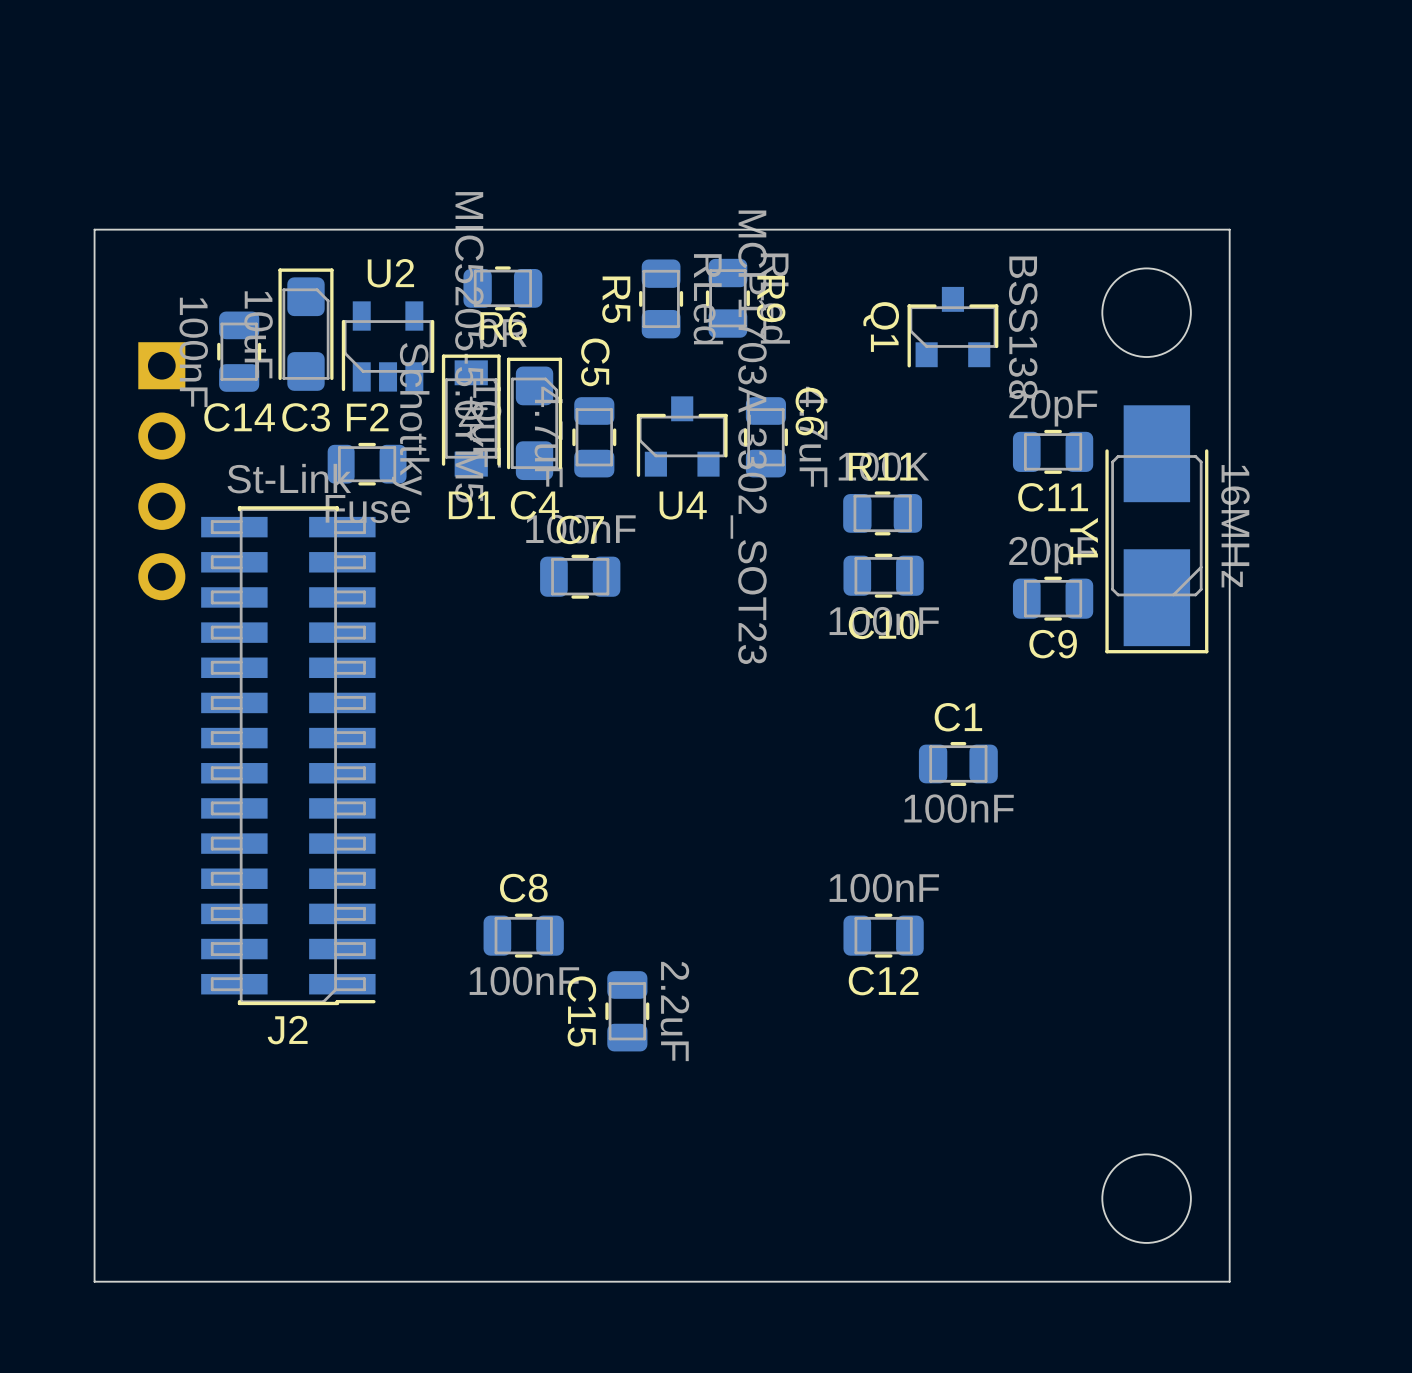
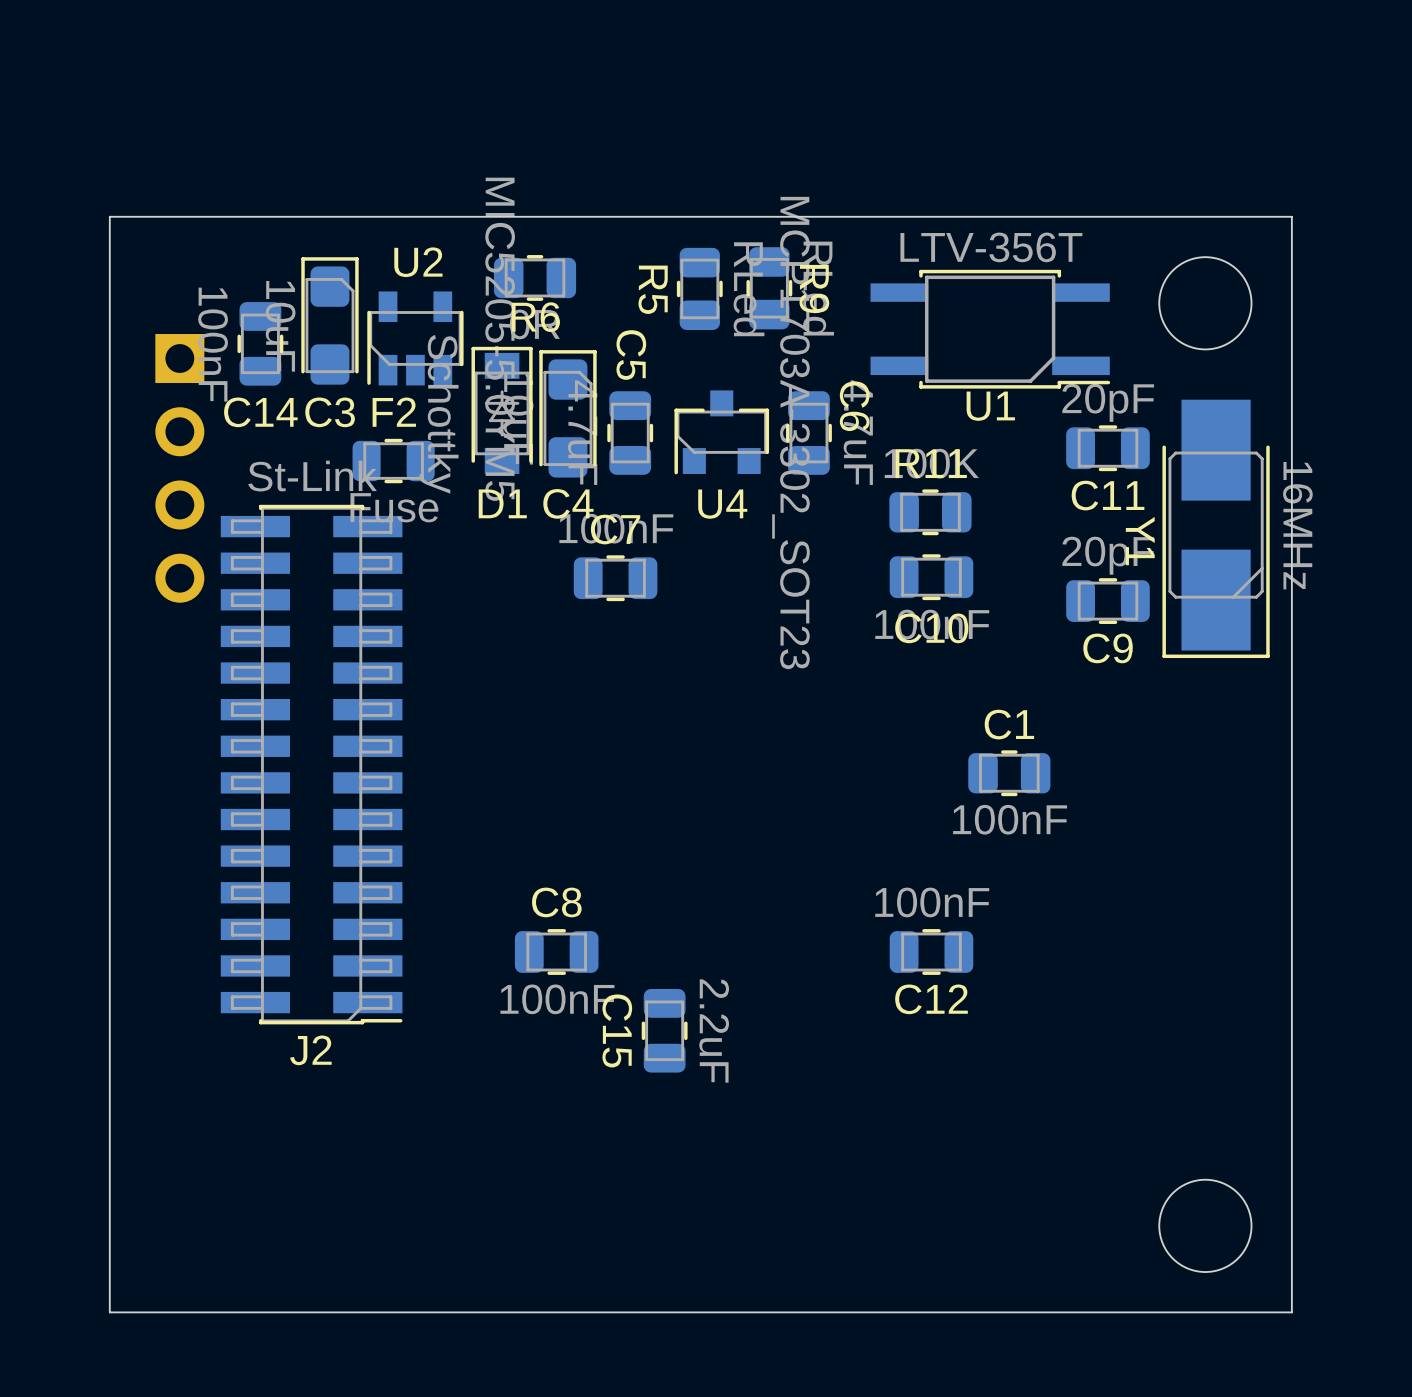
Q1: BSS138 (952, 327) -> none
U1: none -> LTV-356T (990, 329)

